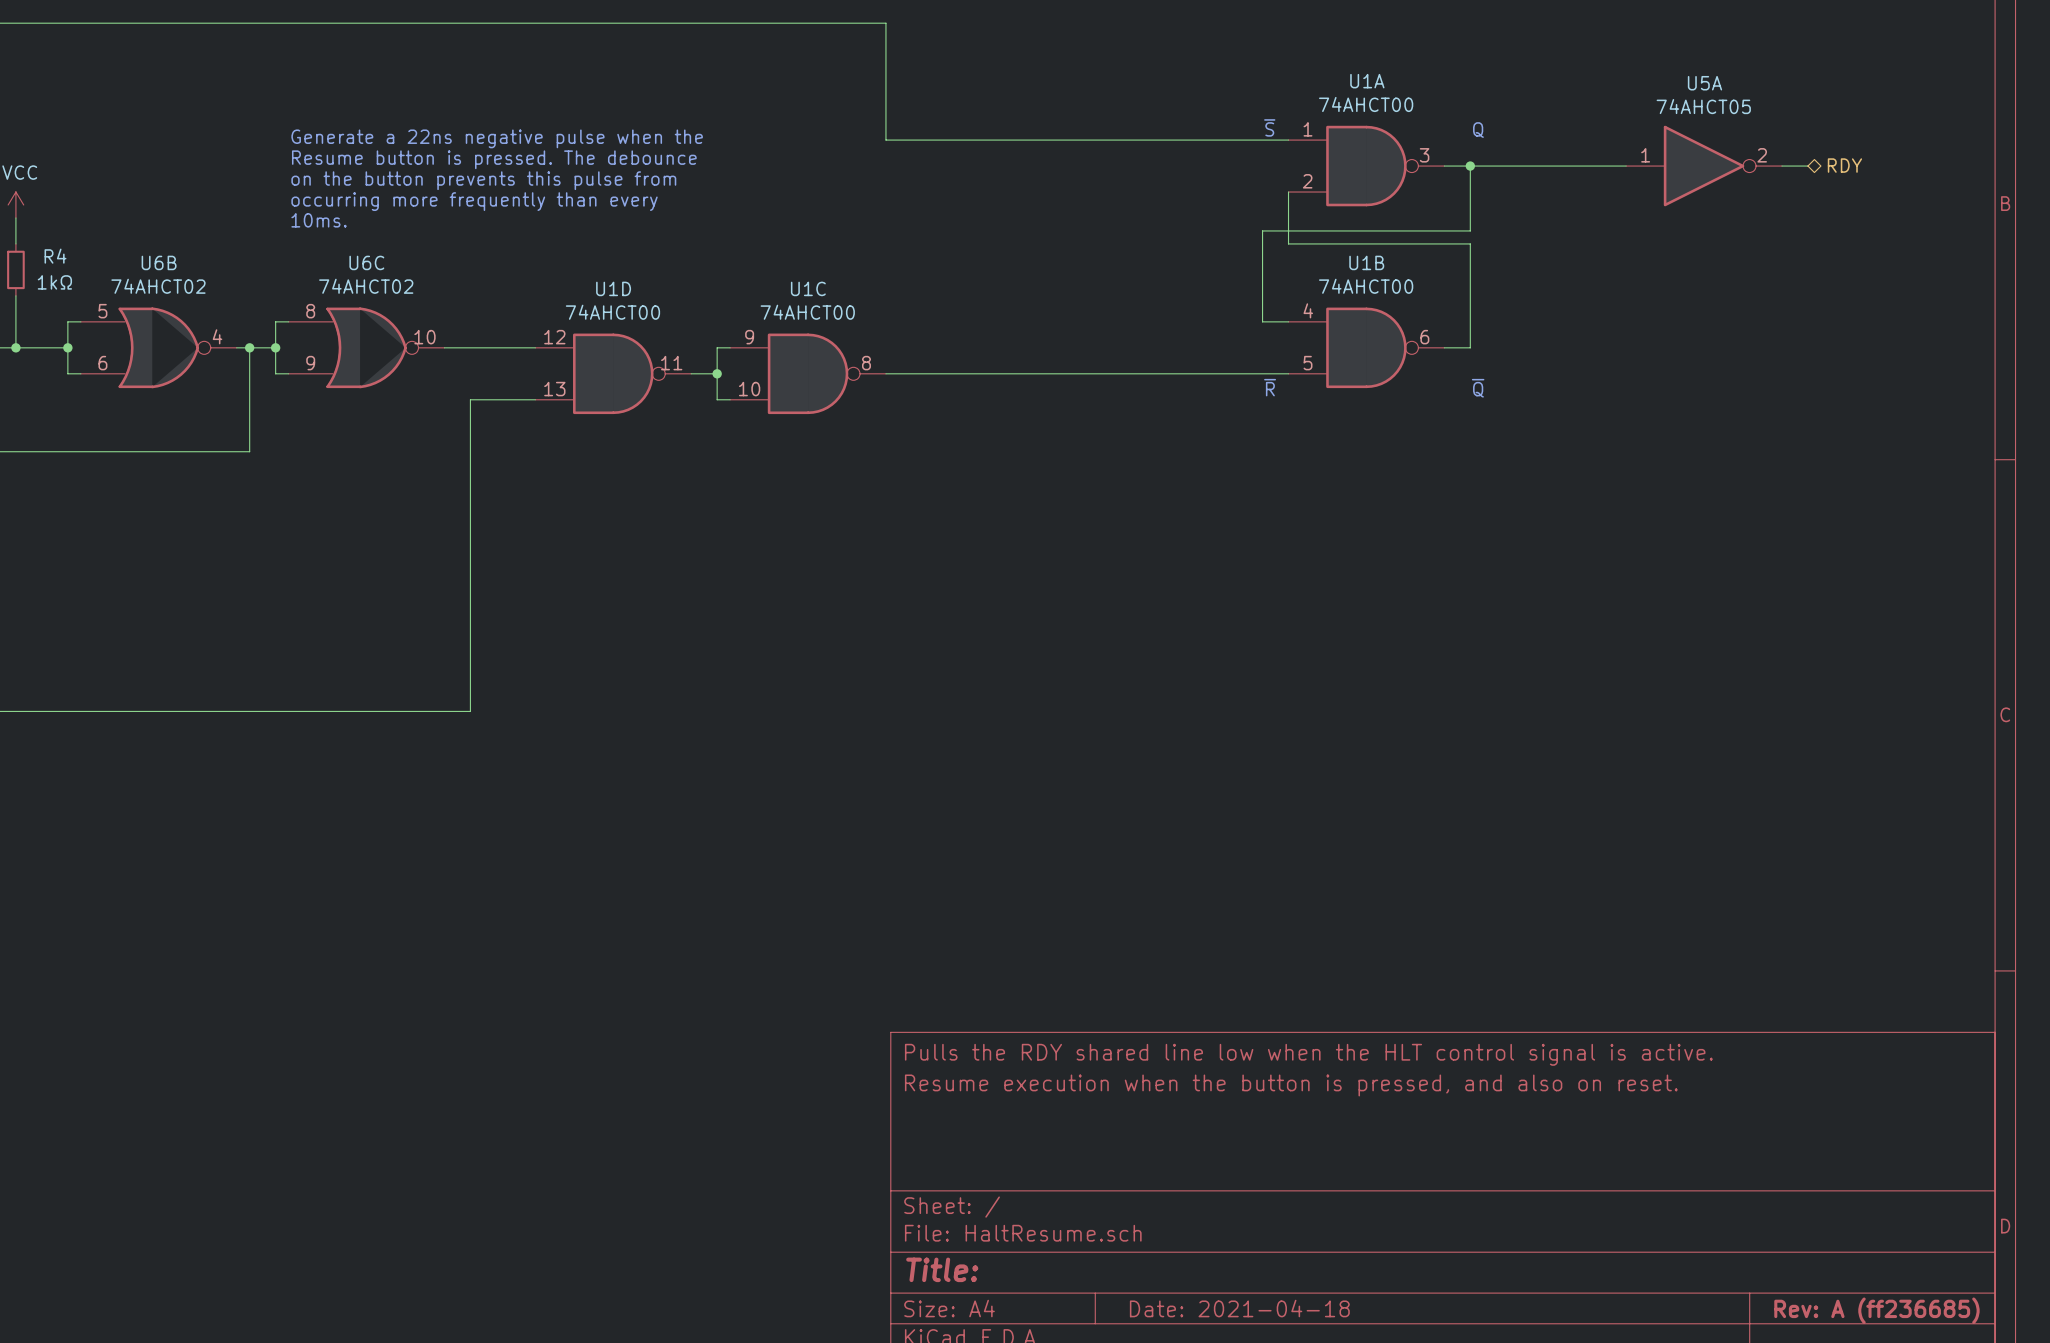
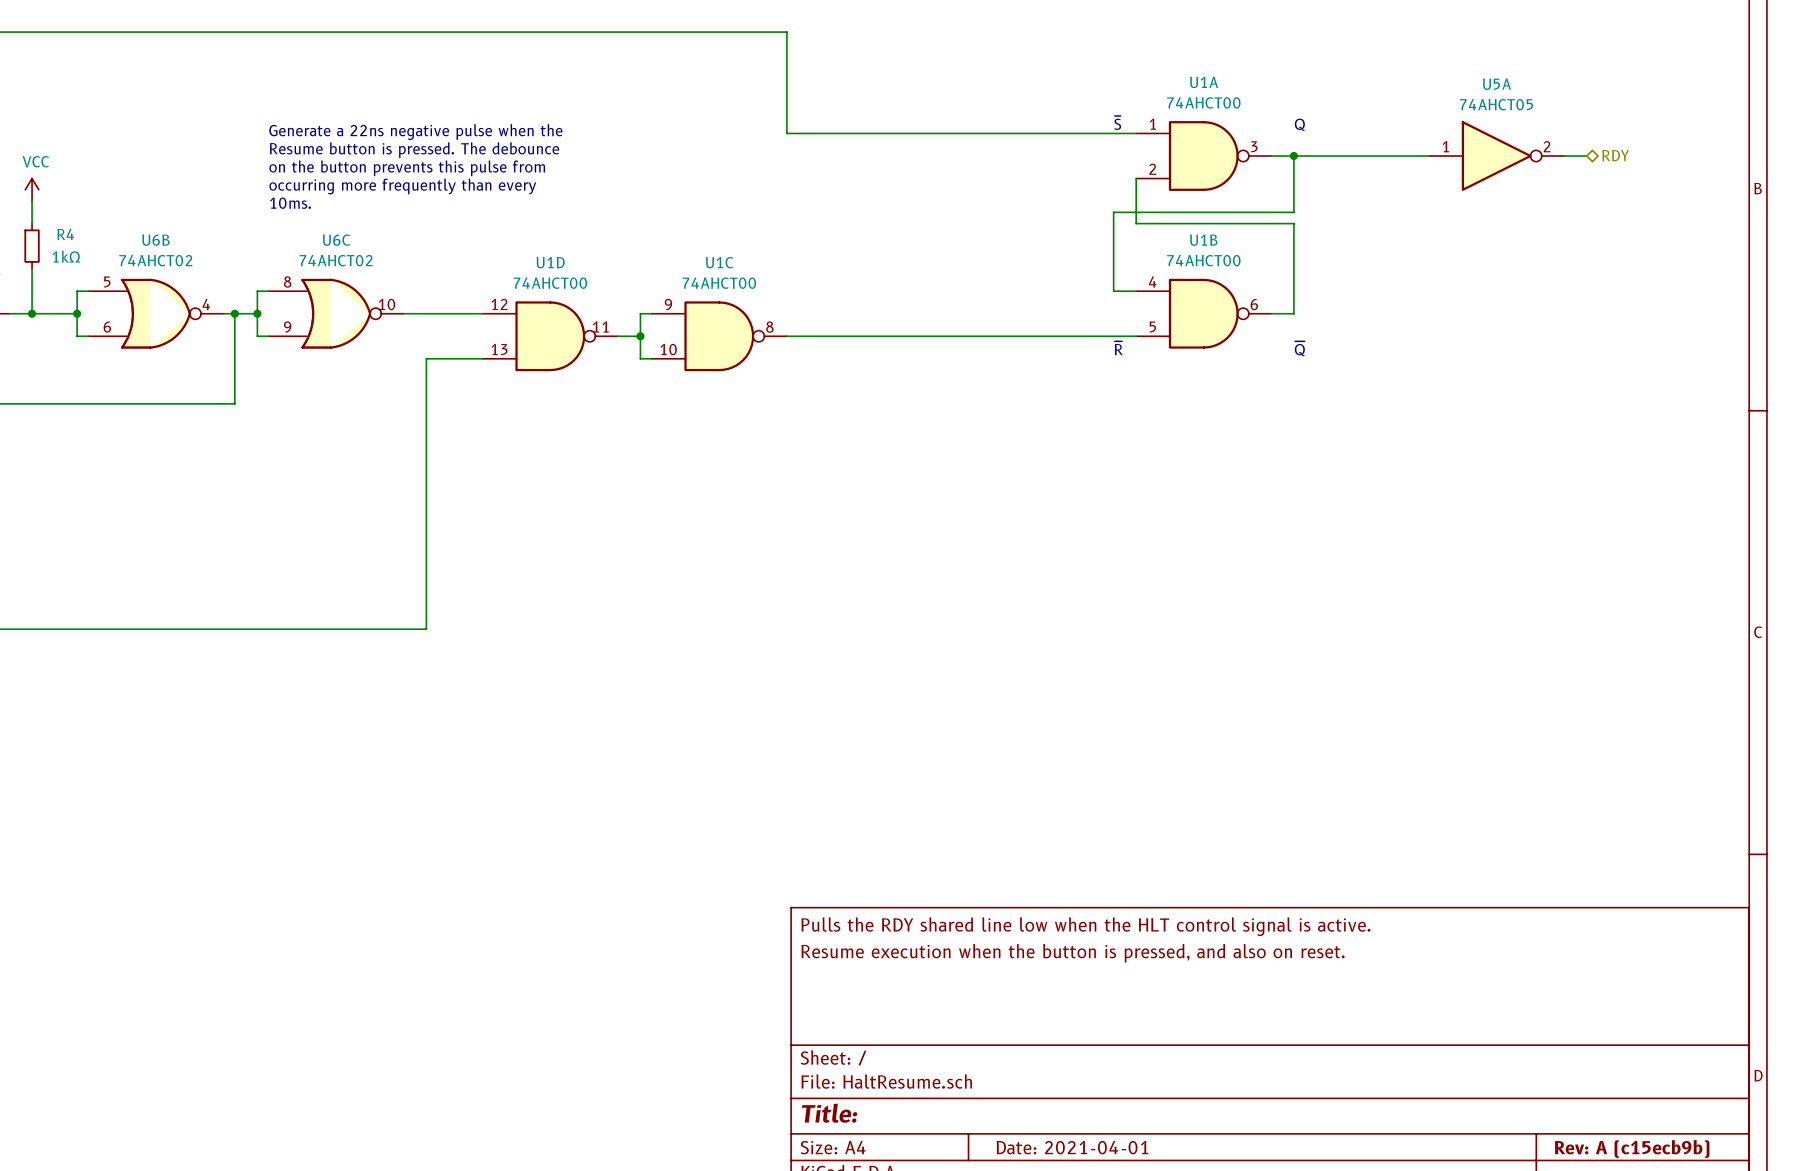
title block: Date: 2021-04-18 (1239, 1308) -> Date: 2021-04-01 (1072, 1147)
title block: Rev: A (ff236685) (1876, 1310) -> Rev: A (c15ecb9b) (1632, 1148)

